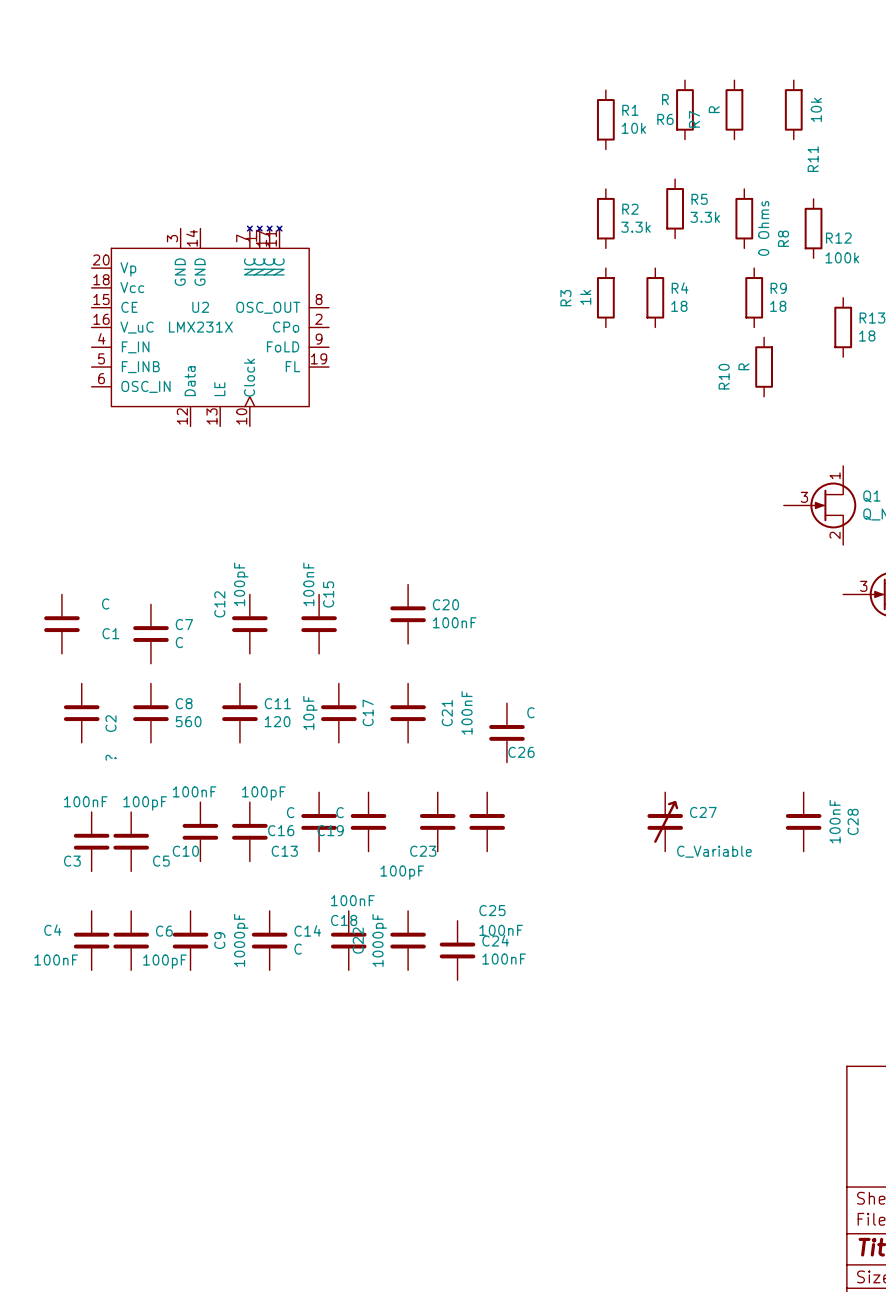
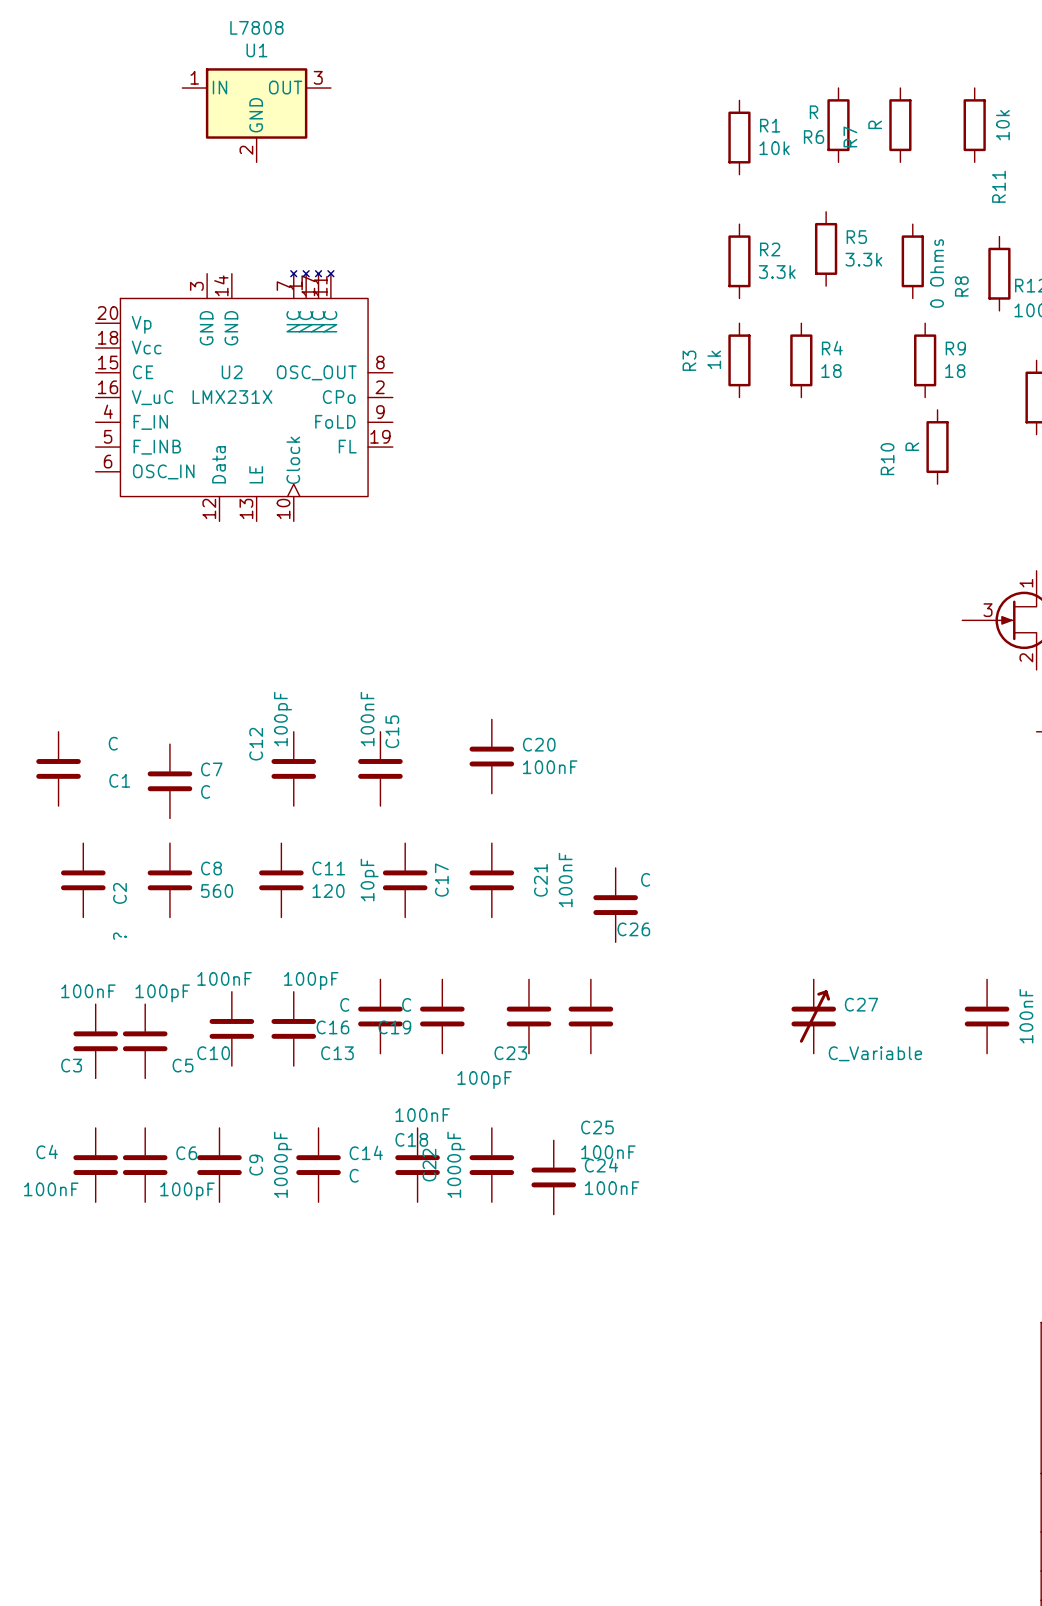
U1: none -> L7808 (256, 115)

